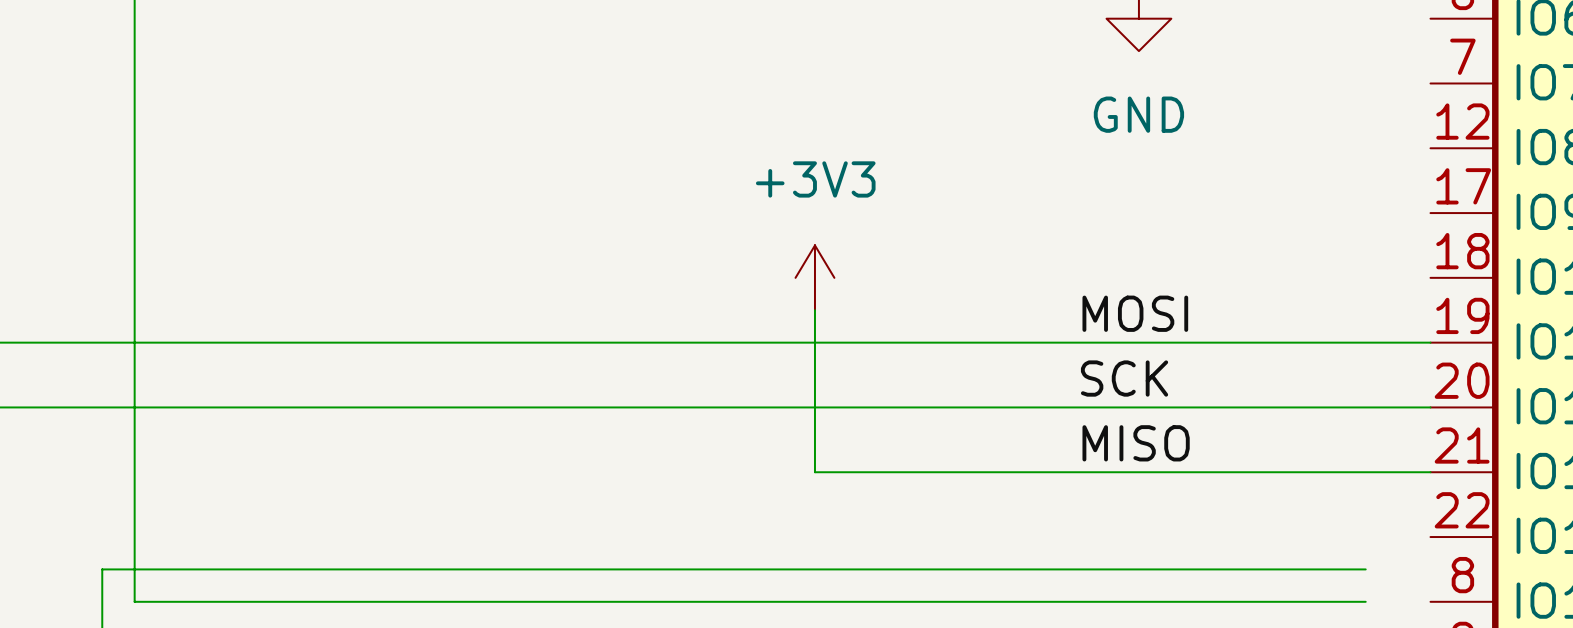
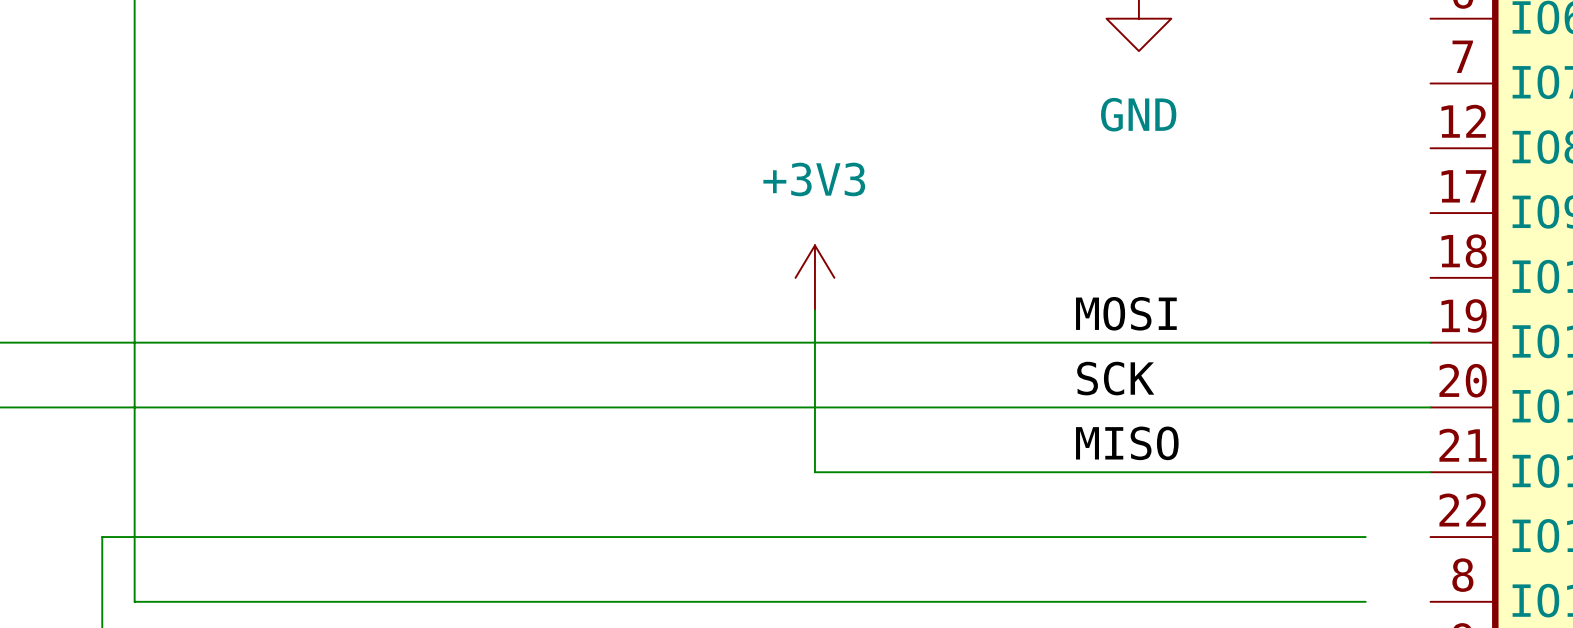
wire: (102, 569) (1365, 569) -> (102, 569) (102, 537) (1365, 537)

